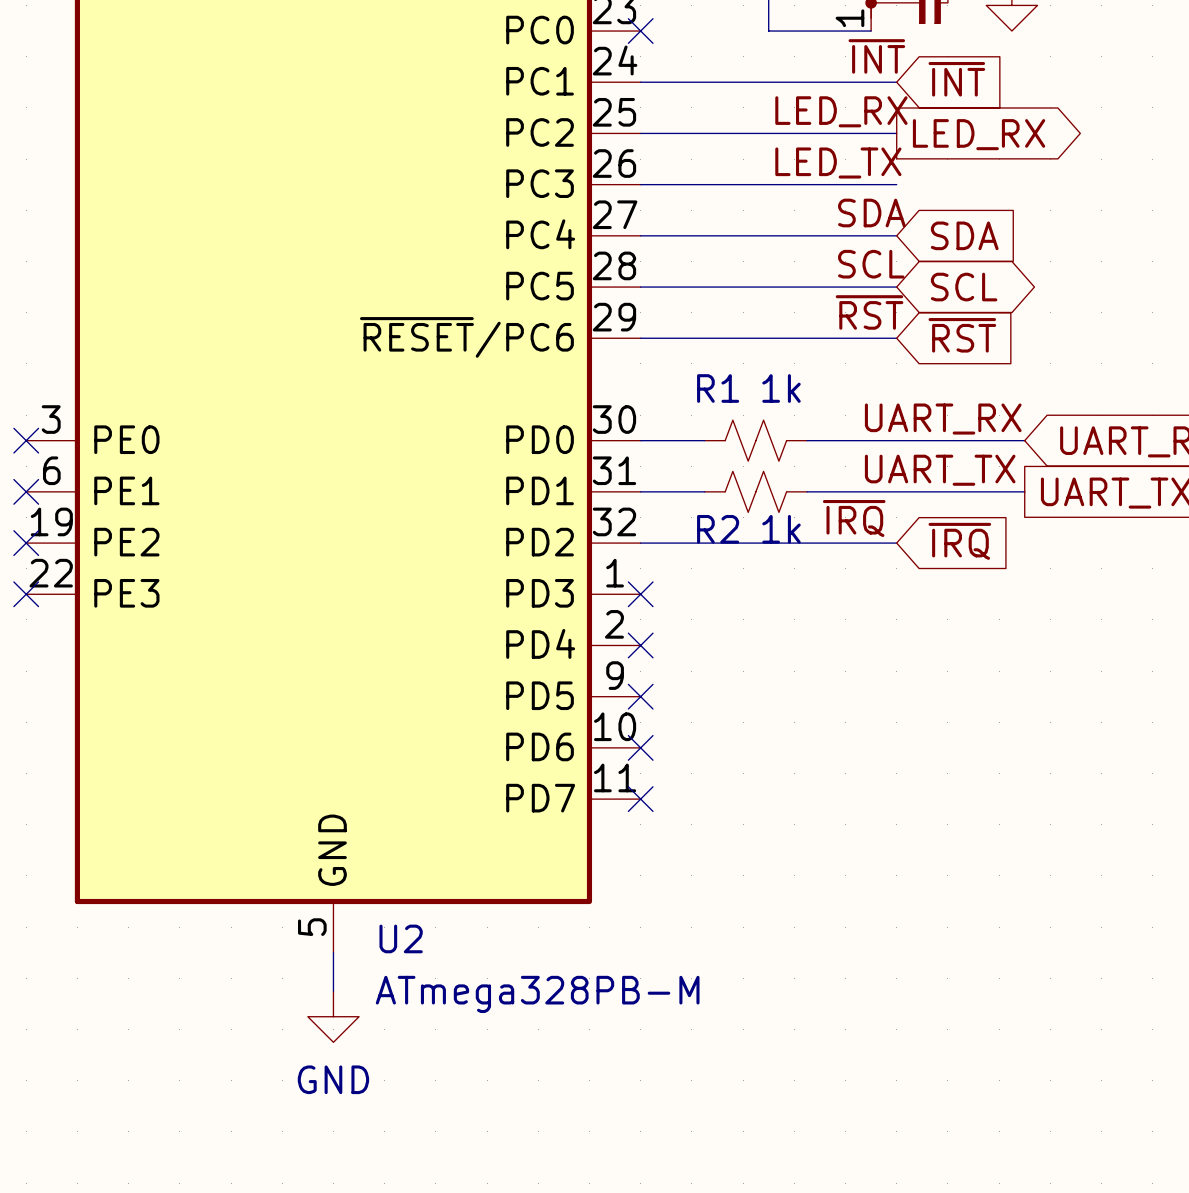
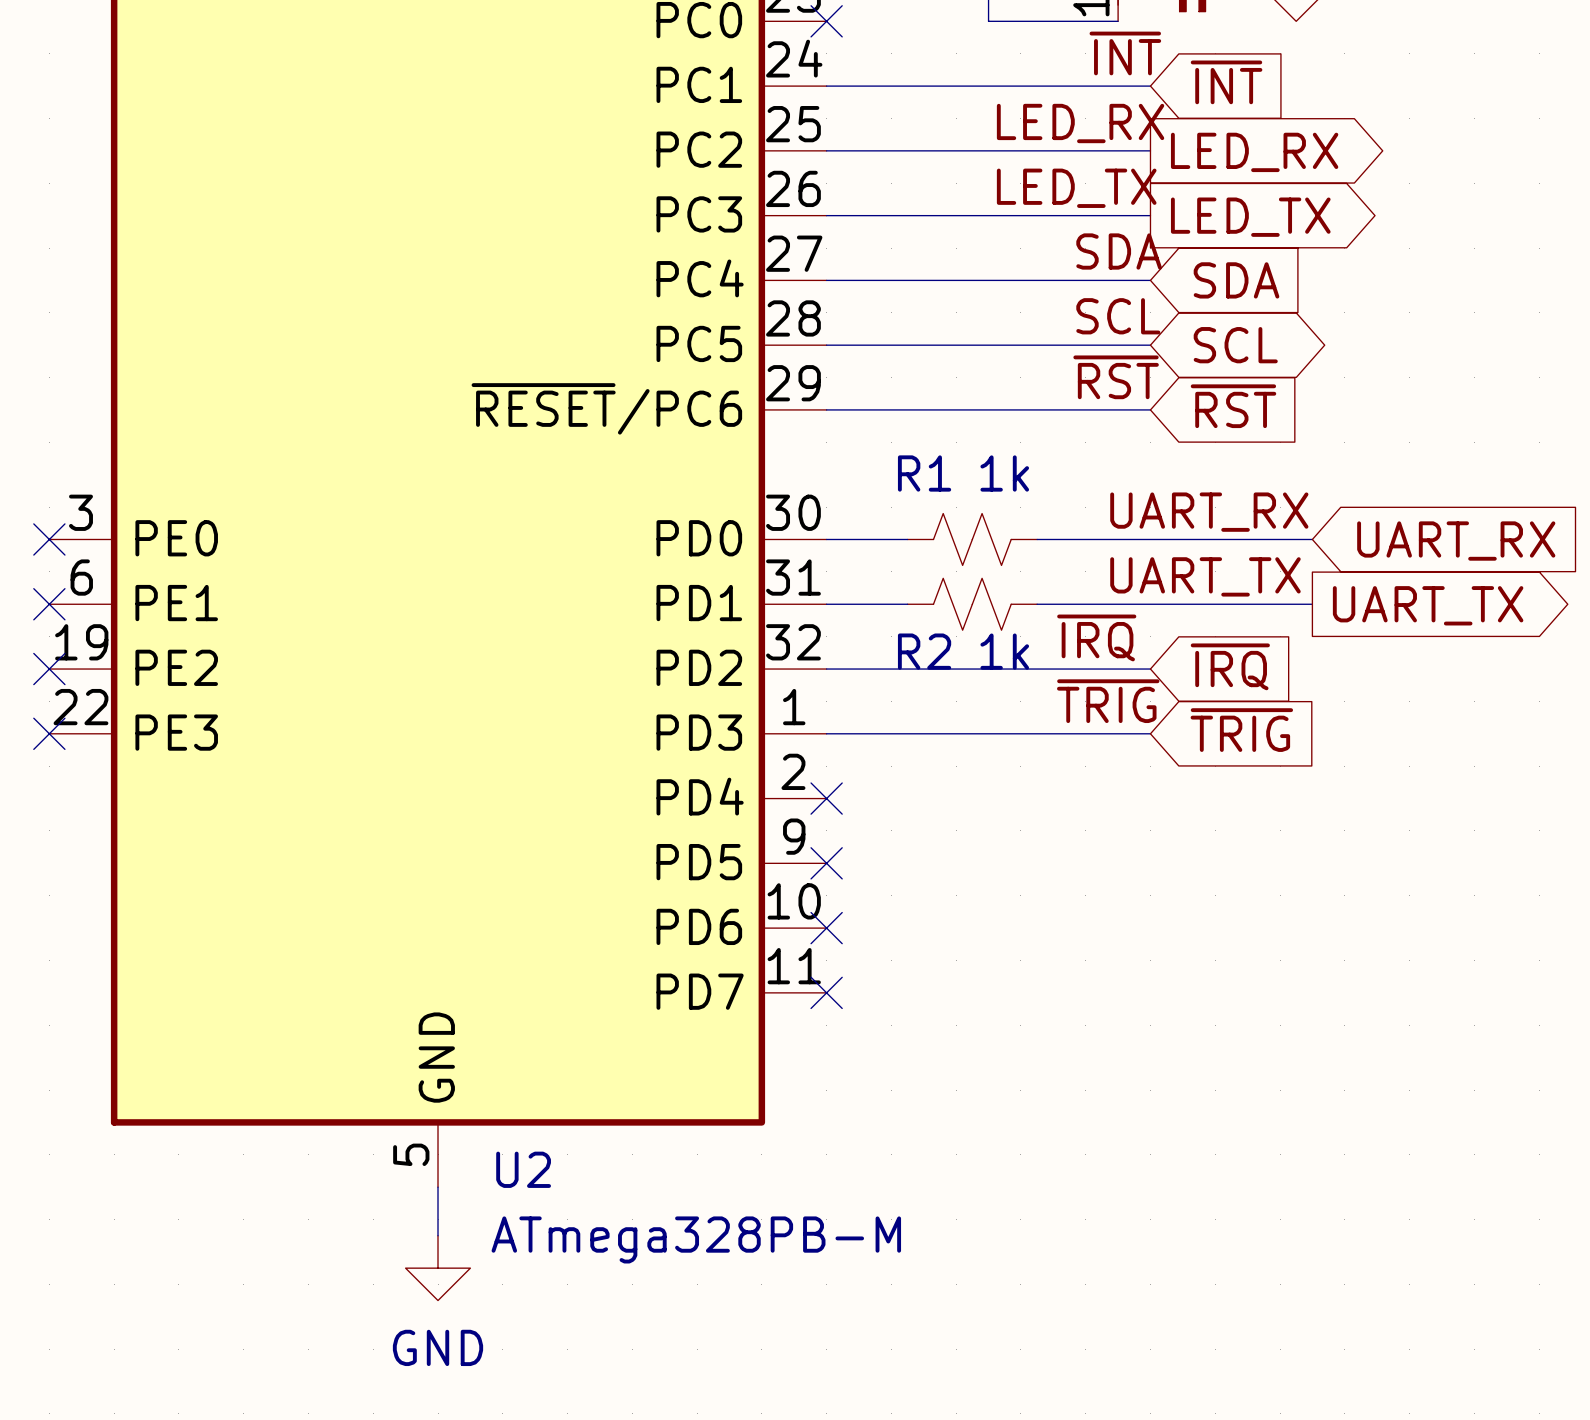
global label: none -> LED_TX (1250, 217)
label: none -> ~{TRIG} (1108, 701)
global label: none -> ~{TRIG} (1241, 730)
wire: none -> (826, 733) (1150, 733)
no-connect mark: (640, 594) -> none

